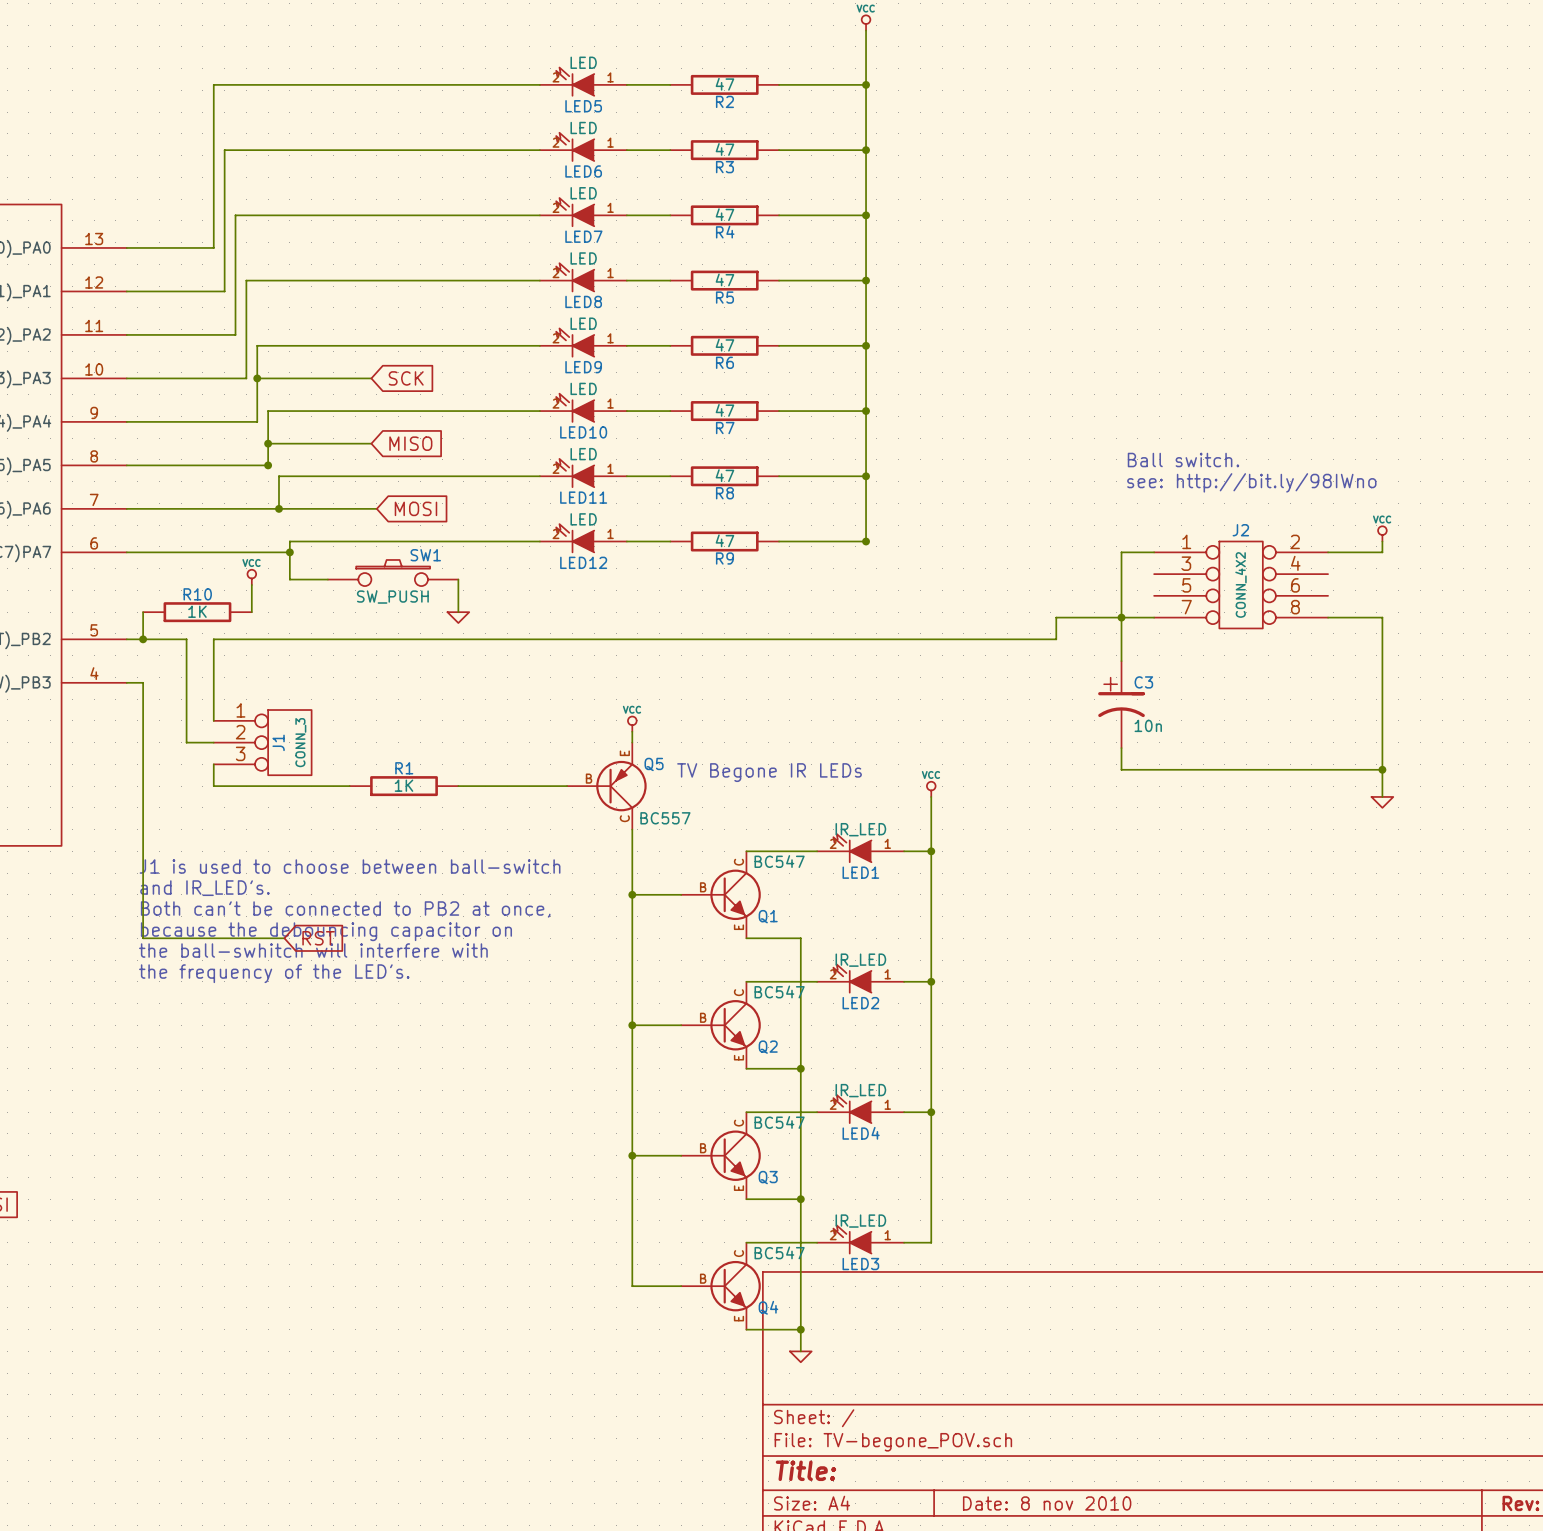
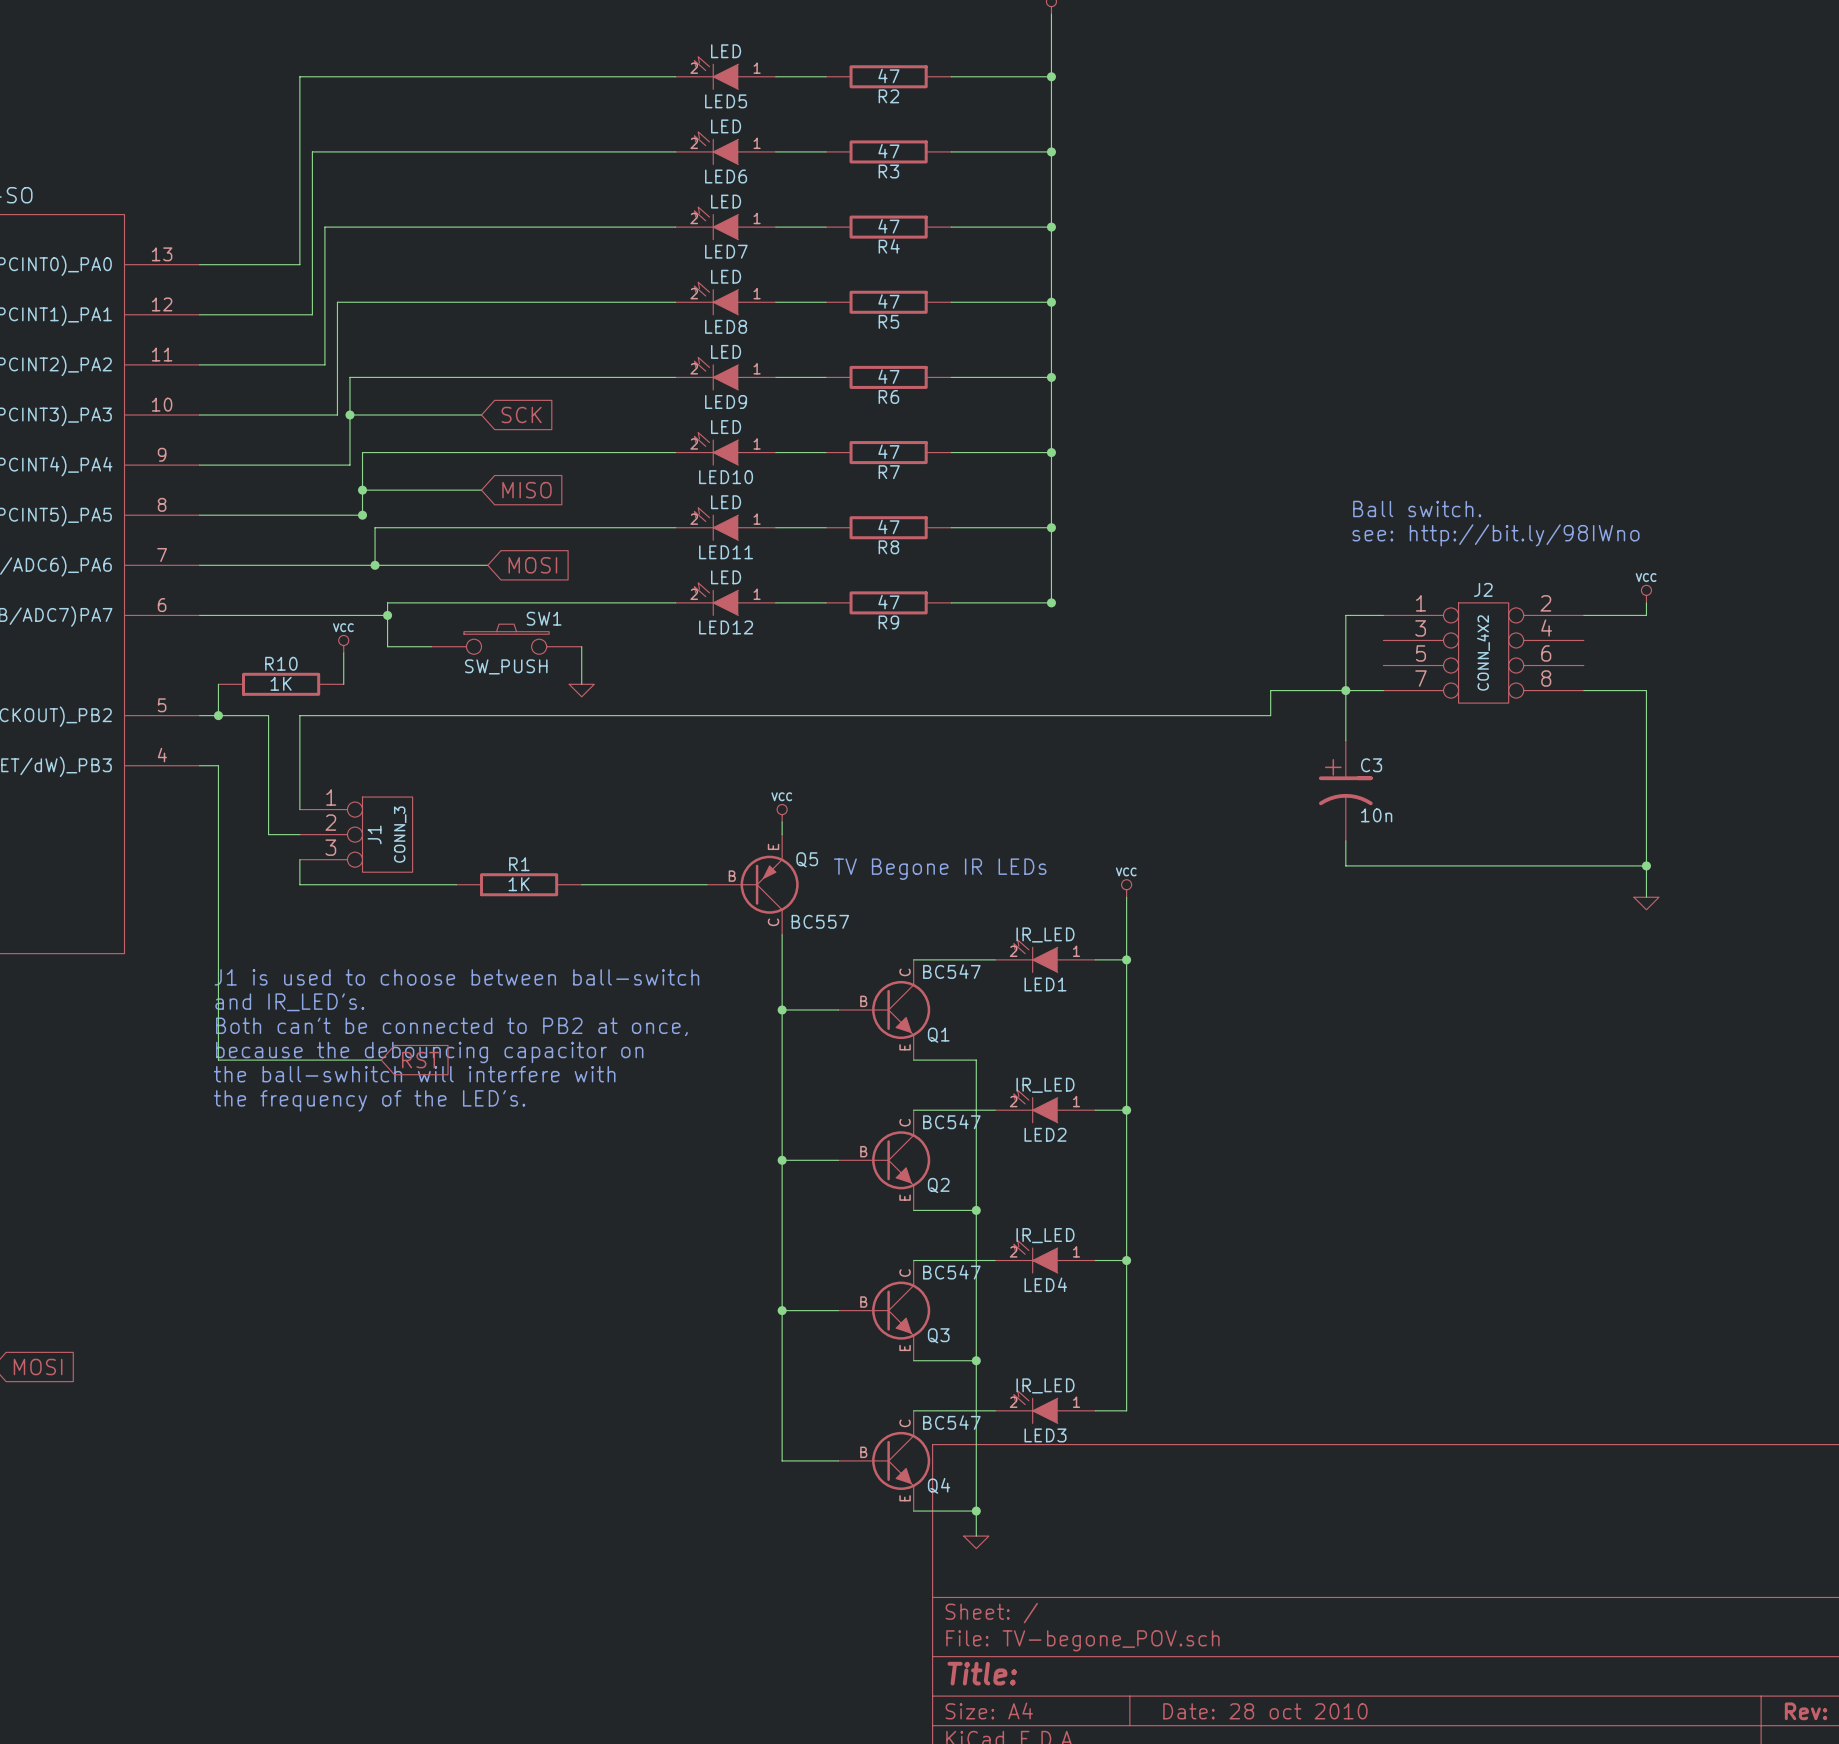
title block: Date: 8 nov 2010 (1047, 1503) -> Date: 28 oct 2010 (1265, 1711)

